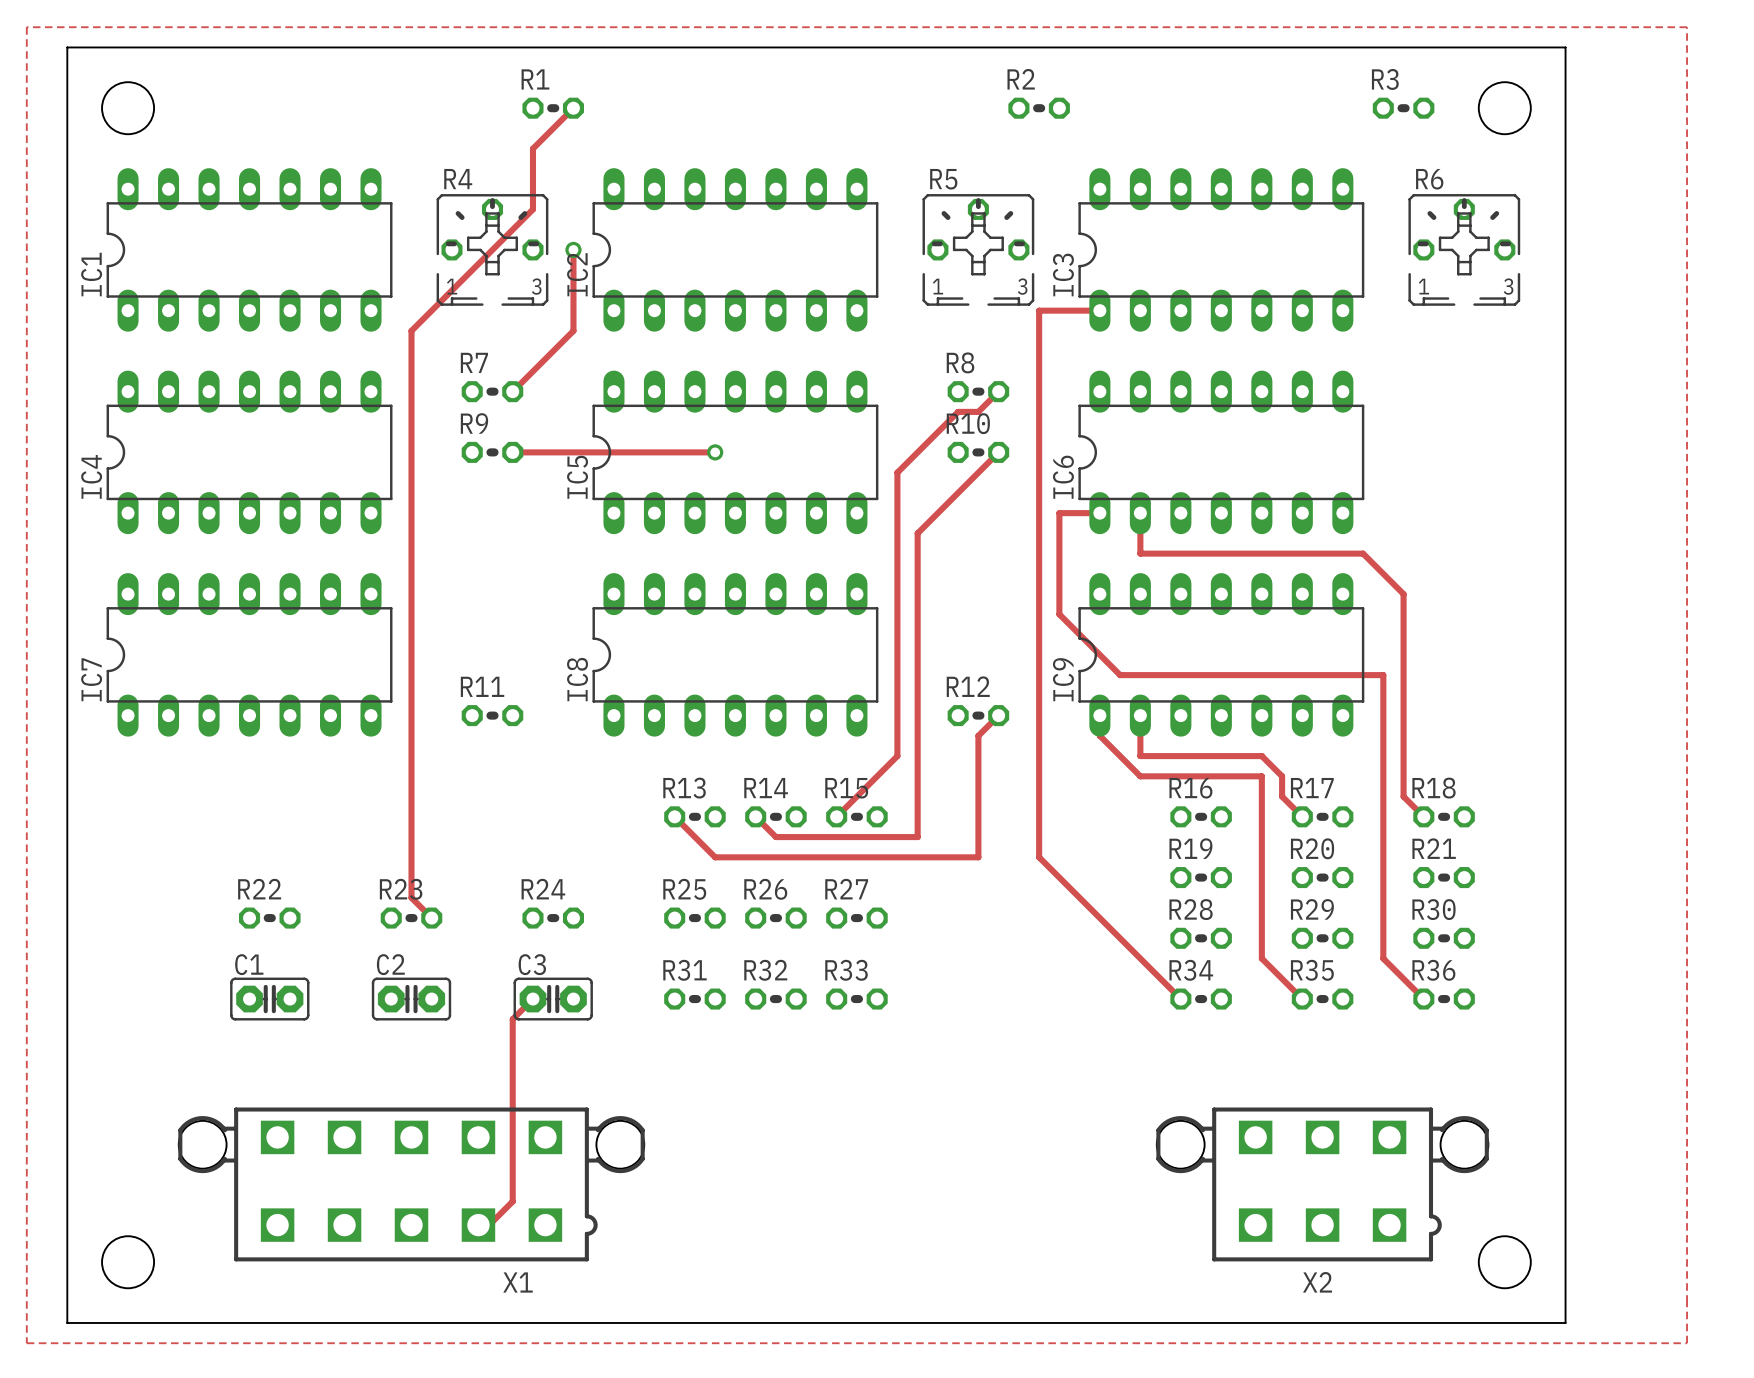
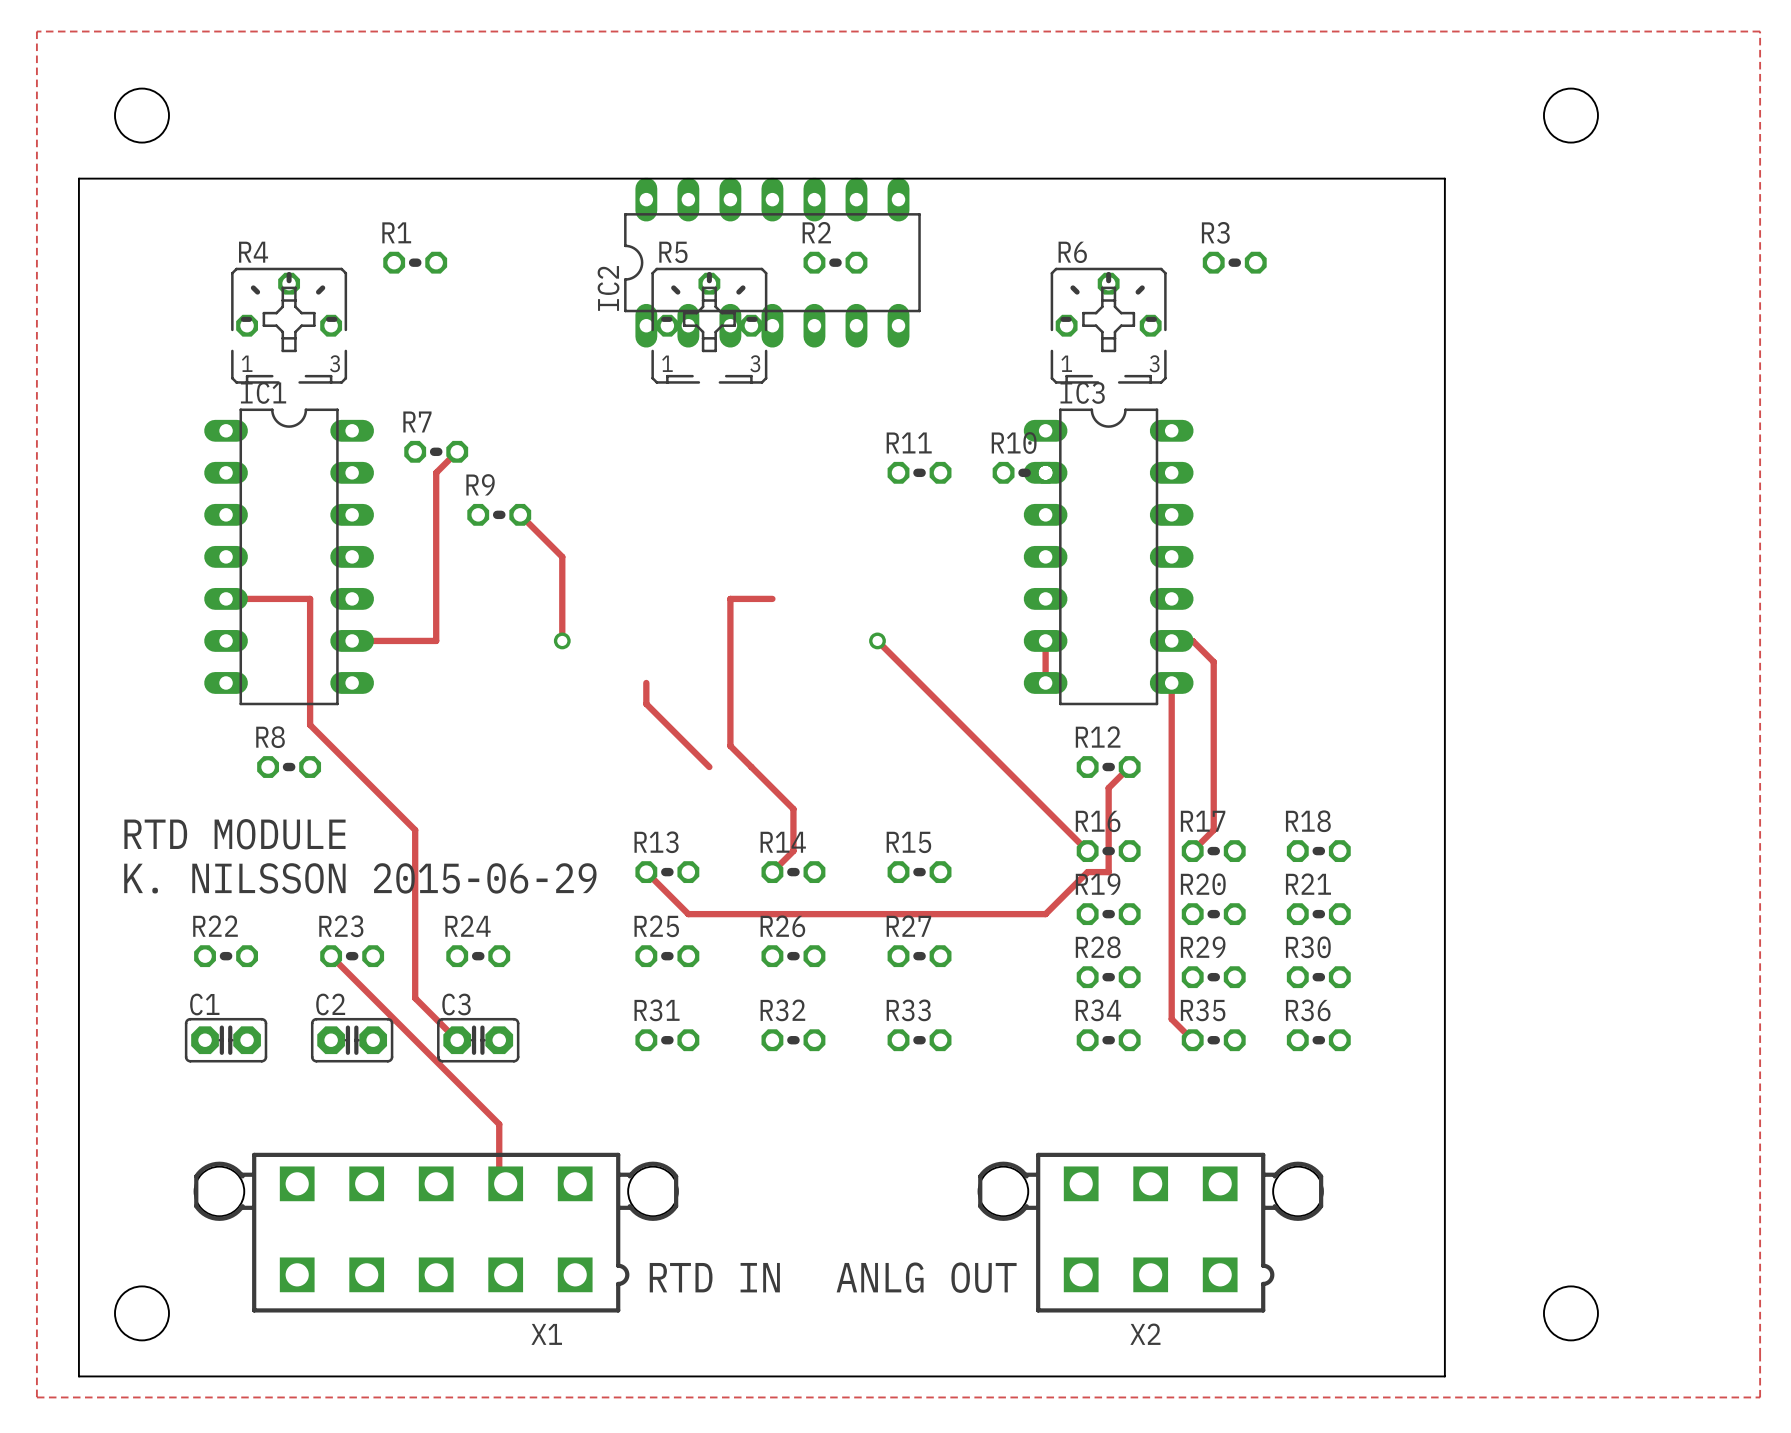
R1 position: (553, 108) -> (415, 262)
track: (573, 108) (532, 148) (532, 209) (411, 330) (411, 452) -> (457, 451) (436, 472)
R2 position: (1039, 108) -> (835, 262)
R3 position: (1403, 108) -> (1234, 262)
board edge: (67, 168) (67, 47) (1565, 47) (1565, 1322) (1383, 1322) -> (78, 178) (1444, 178) (1444, 1376)
IC1 rotation: 0° (249, 249) -> 90° clockwise (289, 556)
IC1 position: (249, 249) -> (289, 556)
R4 position: (492, 249) -> (289, 325)
track: (573, 249) (573, 330) (512, 391) -> none
via: (573, 249) -> none
R5 position: (978, 249) -> (709, 325)
IC3 rotation: 0° (1221, 249) -> 90° clockwise (1108, 556)
IC3 position: (1221, 249) -> (1108, 556)
R6 position: (1464, 249) -> (1108, 325)
track: (1099, 310) (1039, 310) (1039, 857) (1180, 999) -> none
R7 position: (492, 391) -> (436, 451)
R8 position: (978, 391) -> (289, 767)
track: (998, 391) (978, 411) (958, 411) (897, 472) (897, 756) (836, 816) -> none
IC4: (249, 452) -> none
R9 position: (492, 452) -> (499, 514)
track: (512, 452) (715, 452) -> none
via: (715, 452) -> none
IC5: (735, 452) -> none
track: (998, 452) (917, 533) (917, 837) (775, 837) (755, 816) -> none
IC6: (1221, 452) -> none
track: none -> (520, 514) (562, 556) (562, 640)
track: (1099, 513) (1059, 513) (1059, 614) (1120, 675) (1383, 675) (1383, 958) (1423, 999) -> none
track: (1140, 513) (1140, 553) (1363, 553) (1403, 594) (1403, 796) (1423, 816) -> none
track: none -> (226, 598) (310, 598) (310, 724) (415, 830) (415, 998) (457, 1040)
track: none -> (772, 598) (730, 598) (730, 746) (793, 809) (793, 851) (772, 872)
track: (411, 614) (411, 897) (431, 918) -> (436, 640) (352, 640)
via: none -> (562, 640)
track: none -> (877, 640) (1087, 851)
via: none -> (877, 640)
track: none -> (1045, 640) (1045, 682)
track: none -> (1171, 640) (1192, 640) (1213, 661) (1213, 830) (1192, 851)
IC7: (249, 654) -> none
track: none -> (646, 682) (646, 703) (709, 767)
IC8: (735, 654) -> none
track: none -> (1171, 682) (1171, 1019) (1192, 1040)
IC9: (1221, 654) -> none
R11 position: (492, 715) -> (919, 472)
R12 position: (978, 715) -> (1108, 767)
track: (998, 715) (978, 735) (978, 857) (715, 857) (674, 816) -> none
track: (1099, 715) (1099, 735) (1140, 776) (1261, 776) (1261, 958) (1302, 999) -> none
track: (1140, 715) (1140, 756) (1261, 756) (1282, 776) (1282, 796) (1302, 816) -> none
track: none -> (1129, 767) (1108, 788) (1108, 872) (1087, 872) (1045, 914) (688, 914) (646, 872)
text: none -> RTD MODULE (234, 834)
R13 position: (694, 816) -> (667, 872)
R14 position: (775, 816) -> (793, 872)
R15 position: (856, 816) -> (919, 872)
R16 position: (1201, 816) -> (1108, 851)
R17 position: (1322, 816) -> (1213, 851)
R18 position: (1444, 816) -> (1318, 851)
text: none -> K. NILSSON 2015-06-29 (360, 878)
R19 position: (1201, 877) -> (1108, 914)
R20 position: (1322, 877) -> (1213, 914)
R21 position: (1444, 877) -> (1318, 914)
R22 position: (269, 918) -> (226, 956)
track: none -> (331, 956) (499, 1124) (499, 1187) (505, 1183)
R23 position: (411, 918) -> (352, 956)
R24 position: (553, 918) -> (478, 956)
R25 position: (694, 918) -> (667, 956)
R26 position: (775, 918) -> (793, 956)
R27 position: (856, 918) -> (919, 956)
R28 position: (1201, 938) -> (1108, 977)
R29 position: (1322, 938) -> (1213, 977)
R30 position: (1444, 938) -> (1318, 977)
C1 position: (269, 999) -> (226, 1040)
C2 position: (411, 999) -> (352, 1040)
track: (532, 999) (512, 1019) (512, 1201) (492, 1221) (478, 1225) -> none
C3 position: (553, 999) -> (478, 1040)
R31 position: (694, 999) -> (667, 1040)
R32 position: (775, 999) -> (793, 1040)
R33 position: (856, 999) -> (919, 1040)
R34 position: (1201, 999) -> (1108, 1040)
R35 position: (1322, 999) -> (1213, 1040)
R36 position: (1444, 999) -> (1318, 1040)
X2 position: (1322, 1184) -> (1150, 1232)
text: none -> RTD IN (714, 1277)
text: none -> ANLG OUT (926, 1277)

